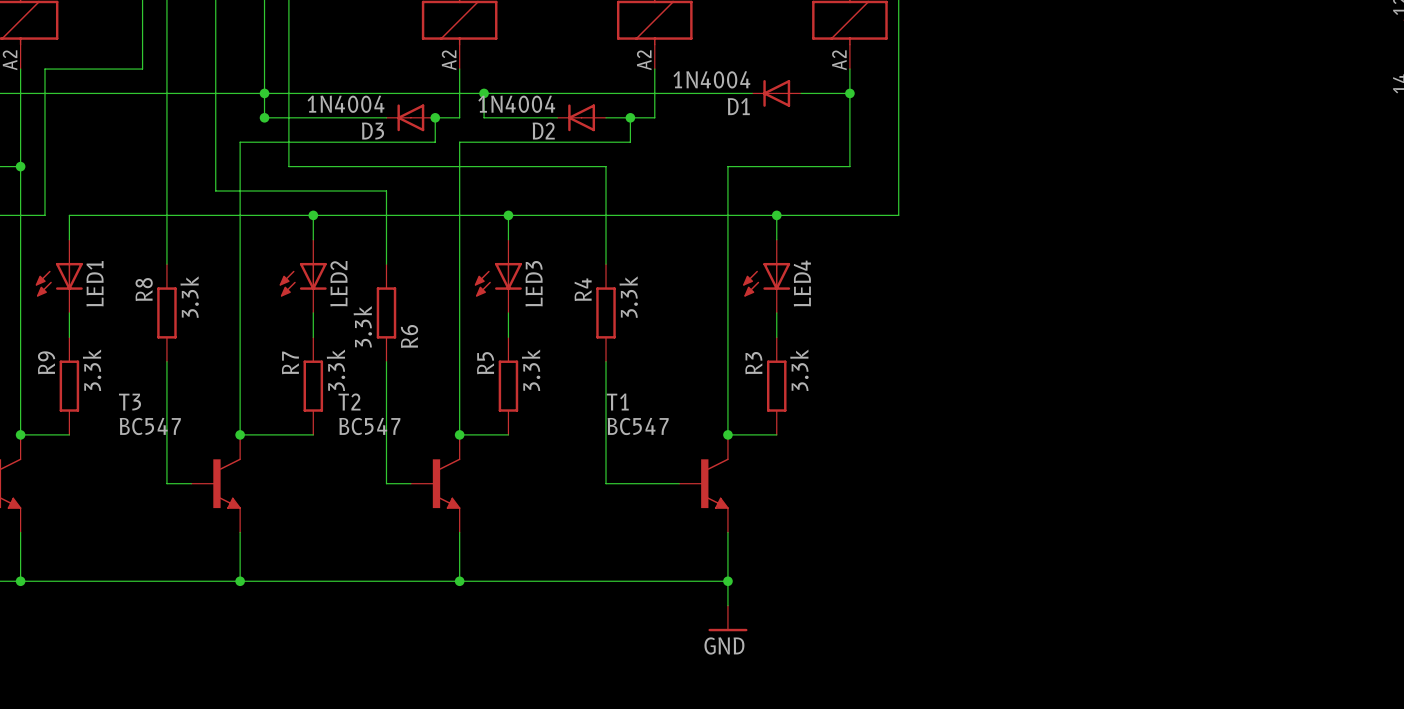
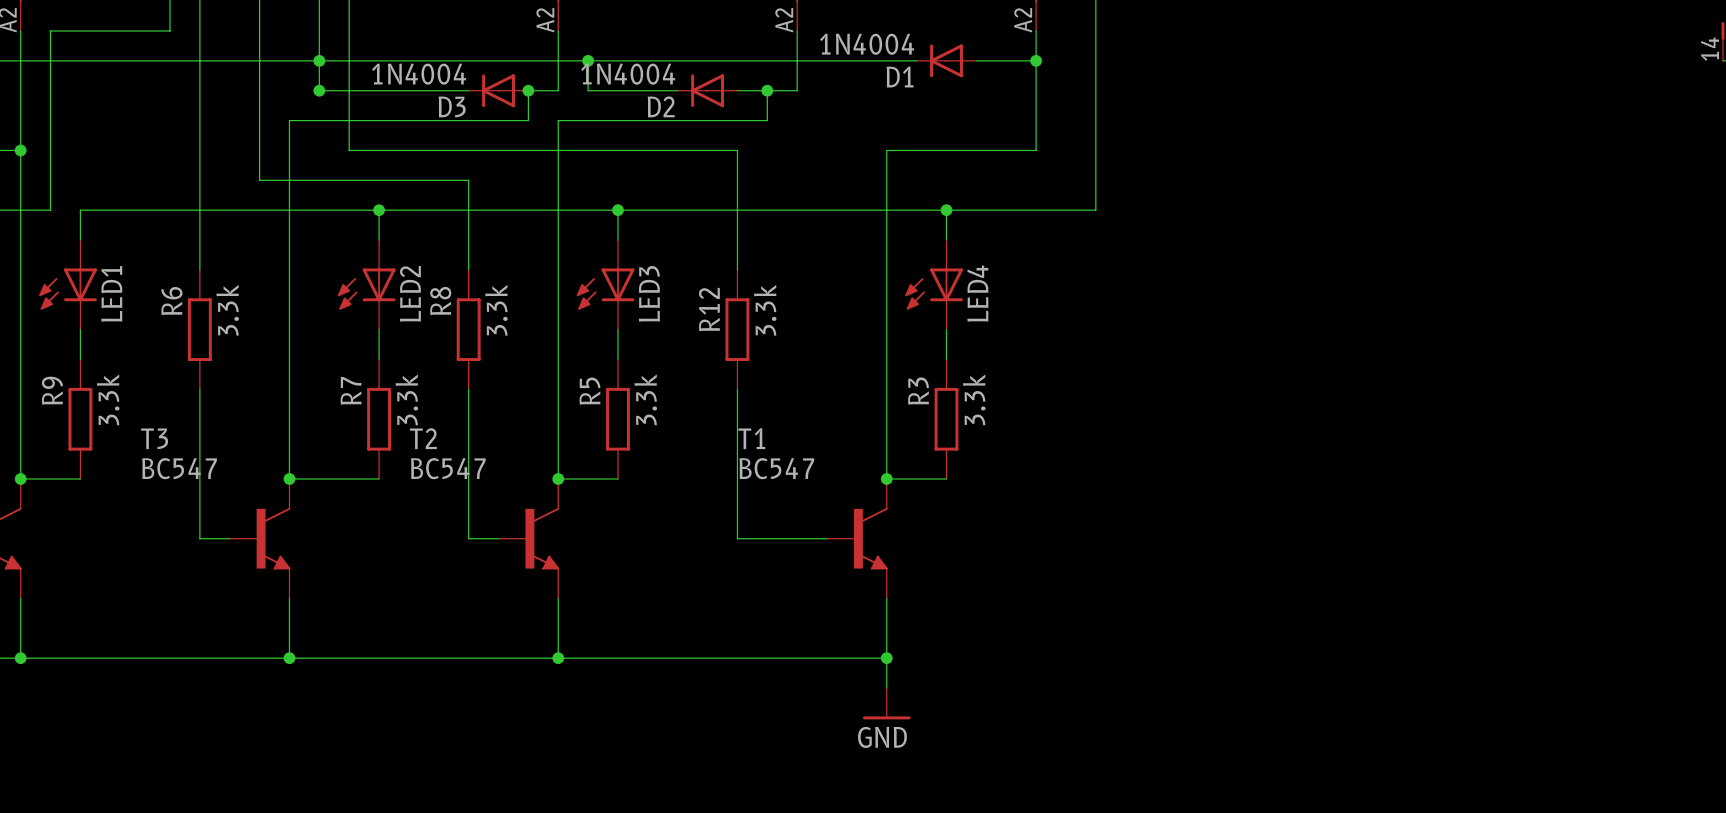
R8 name: R8 (144, 289) -> R6 (171, 301)
R4 name: R4 (583, 289) -> R12 (709, 309)
R6 value position: 3.3k (362, 326) -> 3.3k (496, 310)
R6 name: R6 (409, 336) -> R8 (440, 301)

